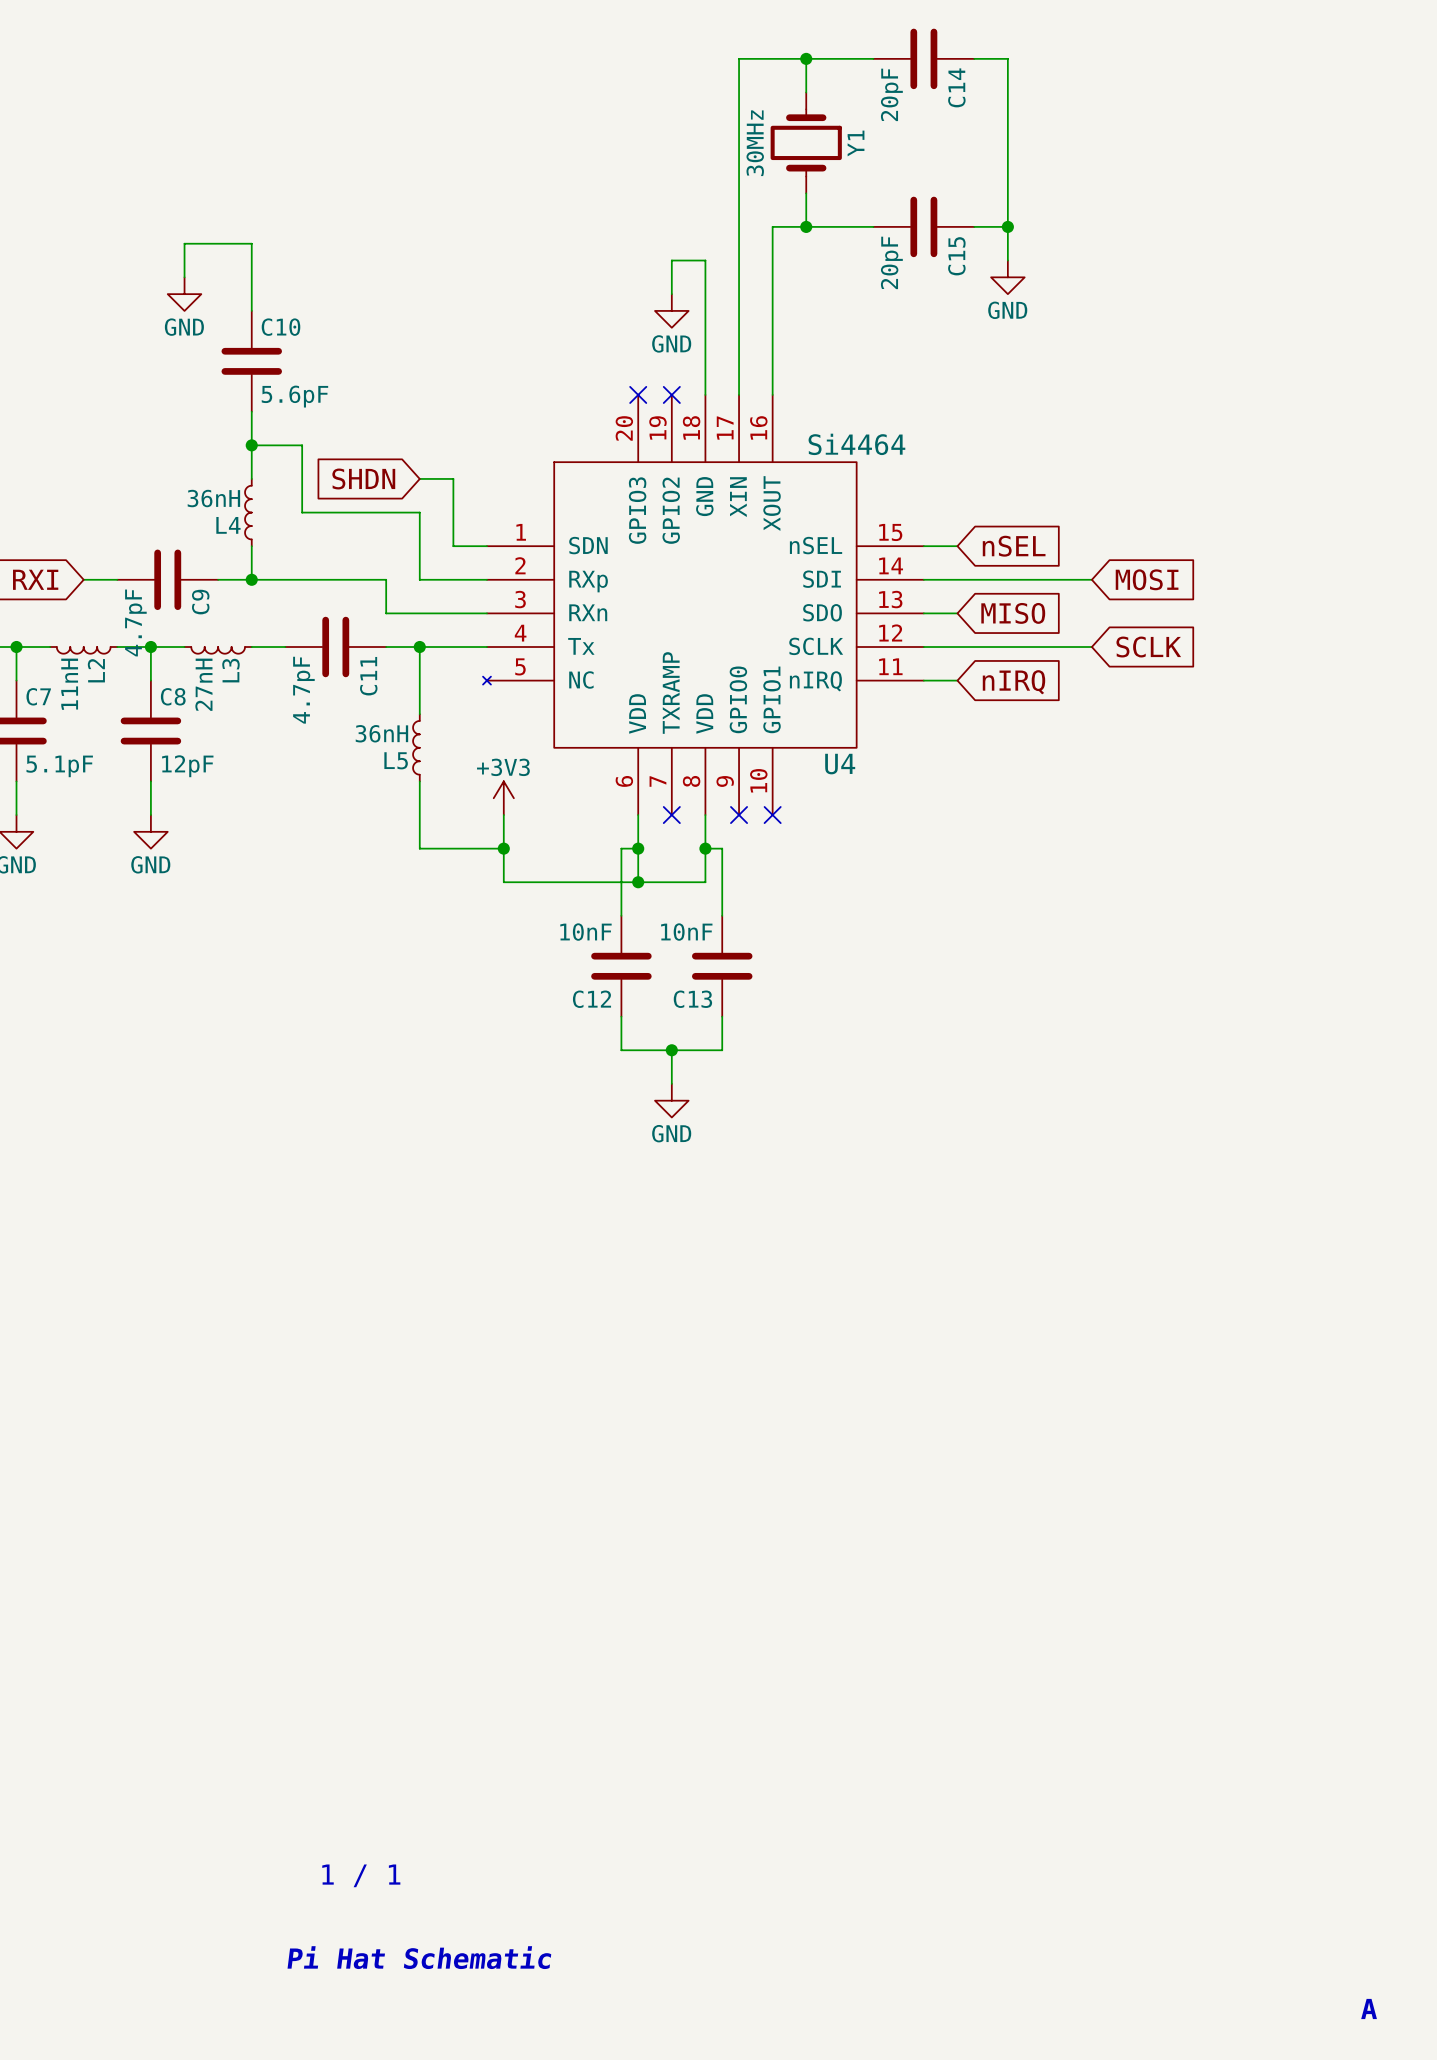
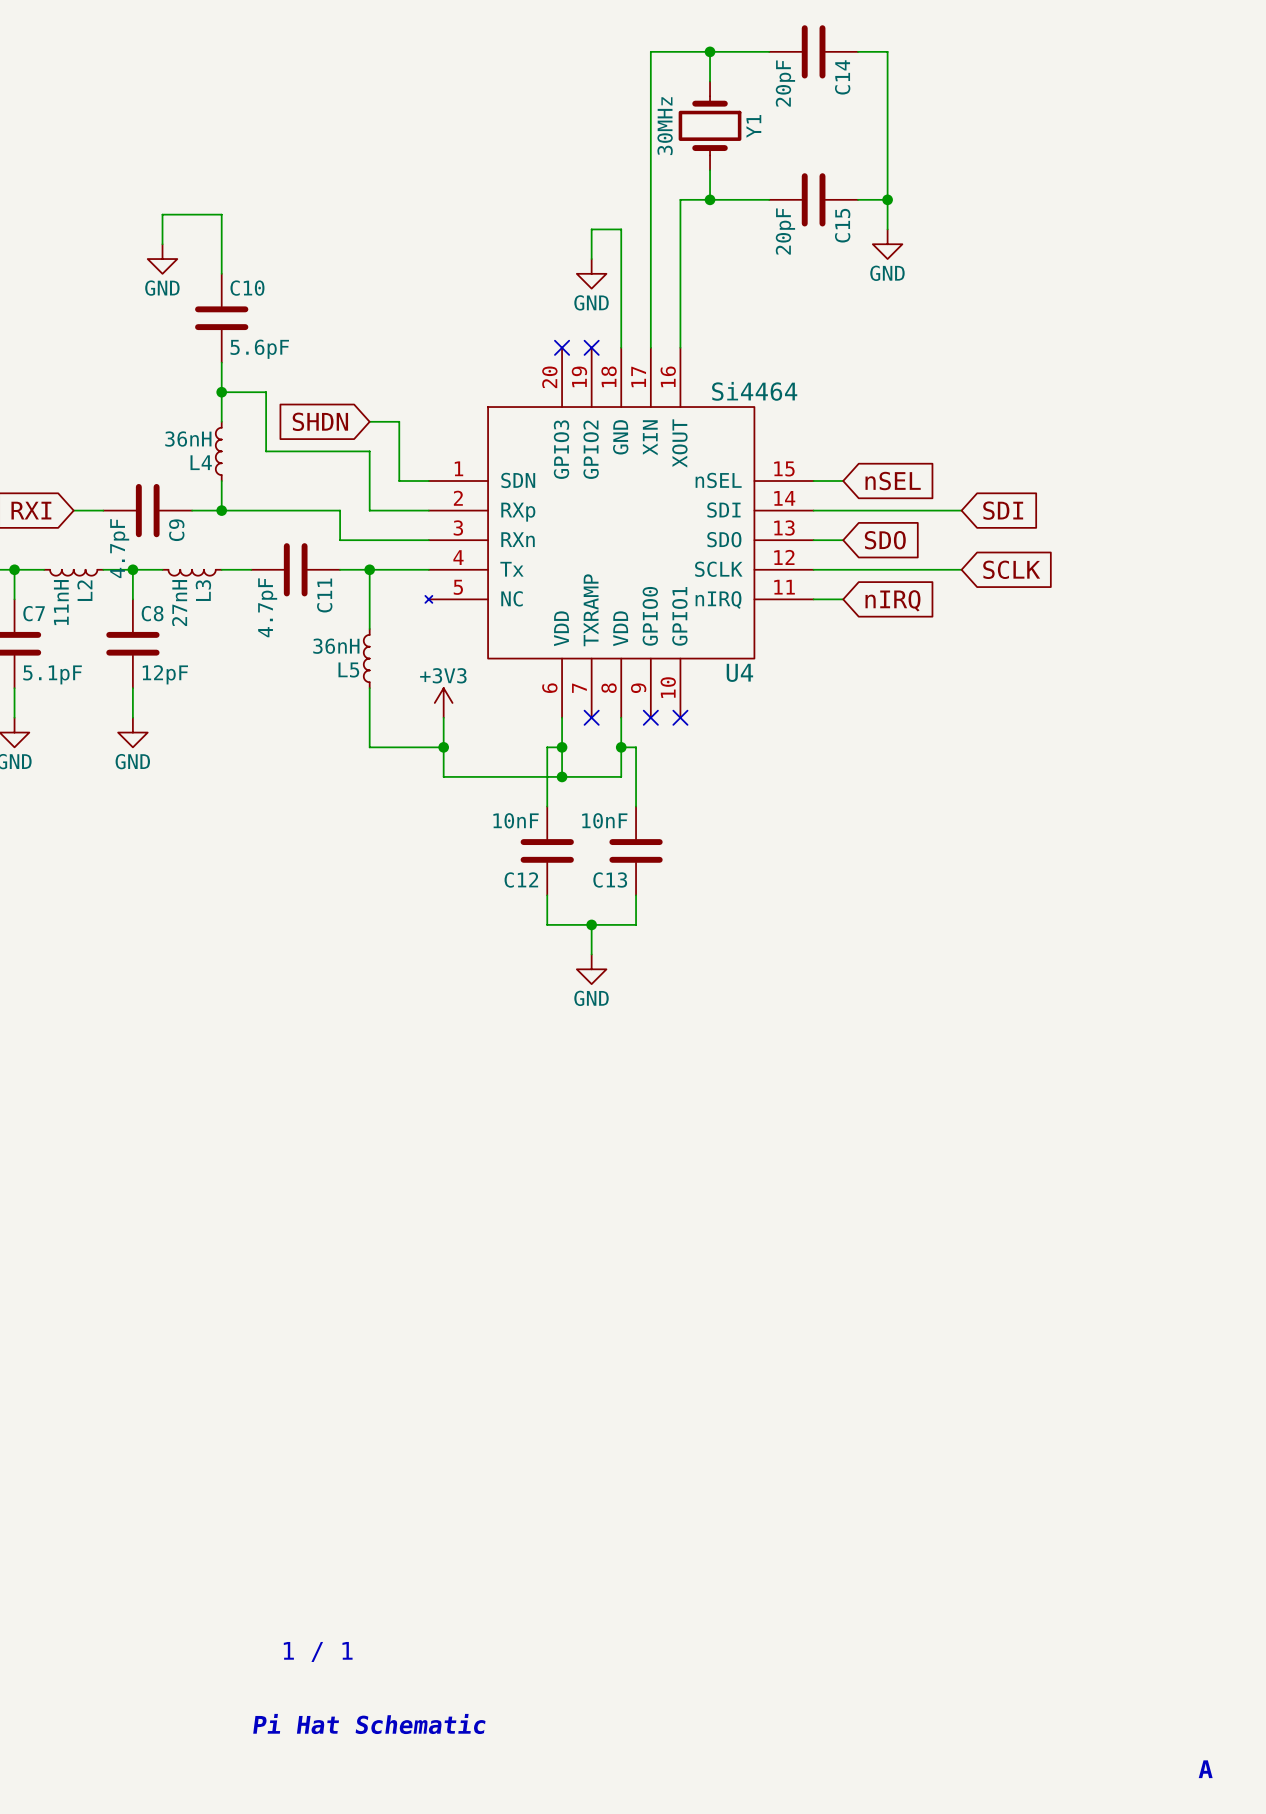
global label: MOSI (1147, 579) -> SDI (1003, 510)
global label: MISO (1013, 613) -> SDO (885, 540)

